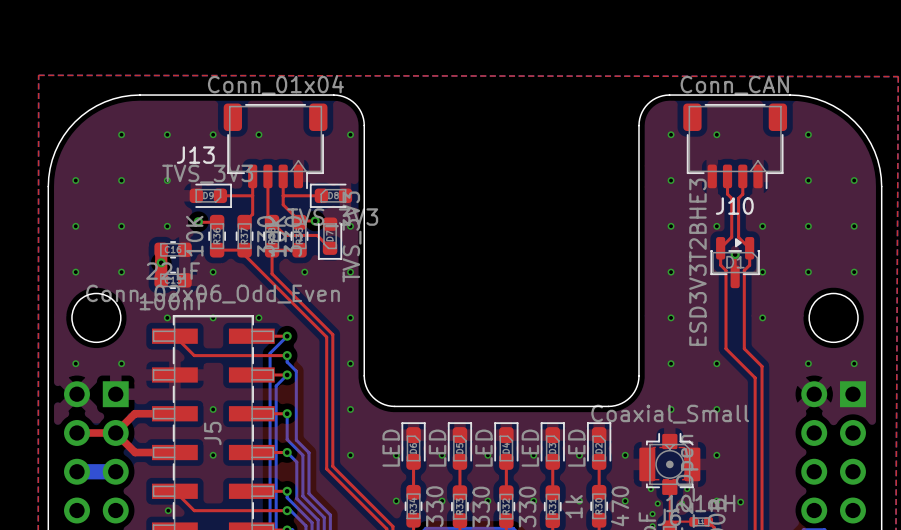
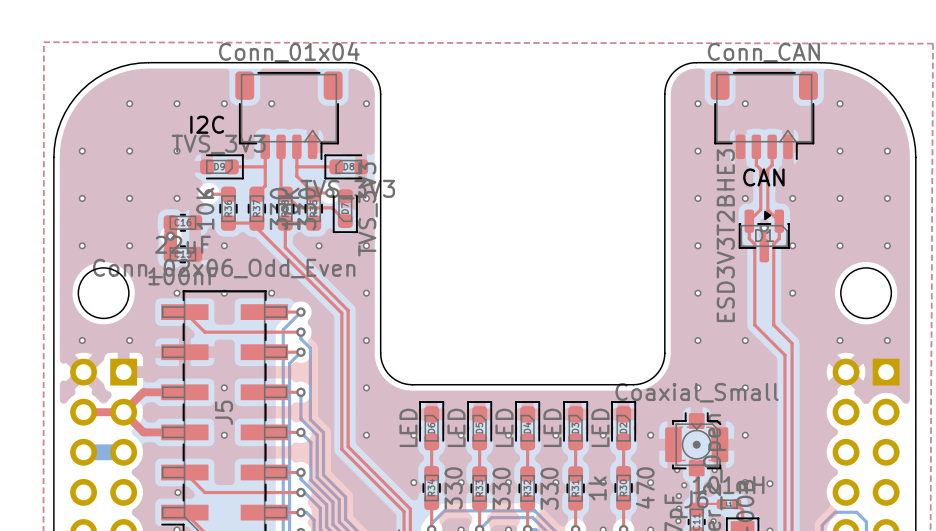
J13 name: J13 (195, 155) -> I2C (207, 124)
J10 name: J10 (734, 206) -> CAN (763, 177)

